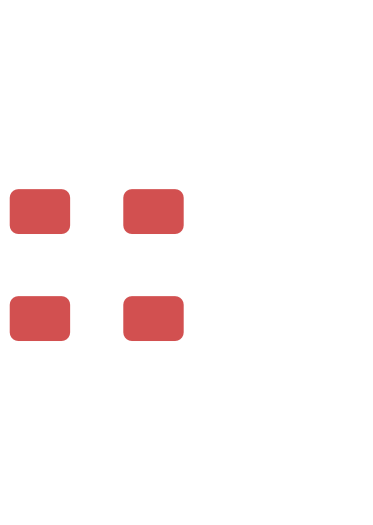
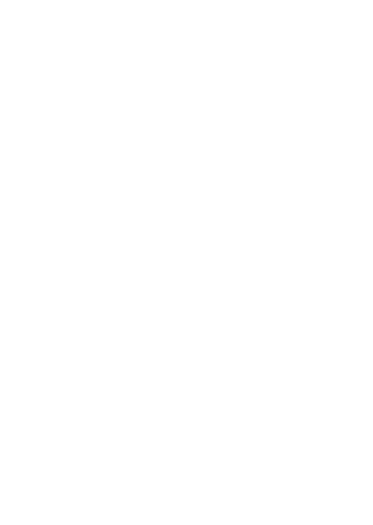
part: (39, 265) -> none
part: (153, 265) -> none

